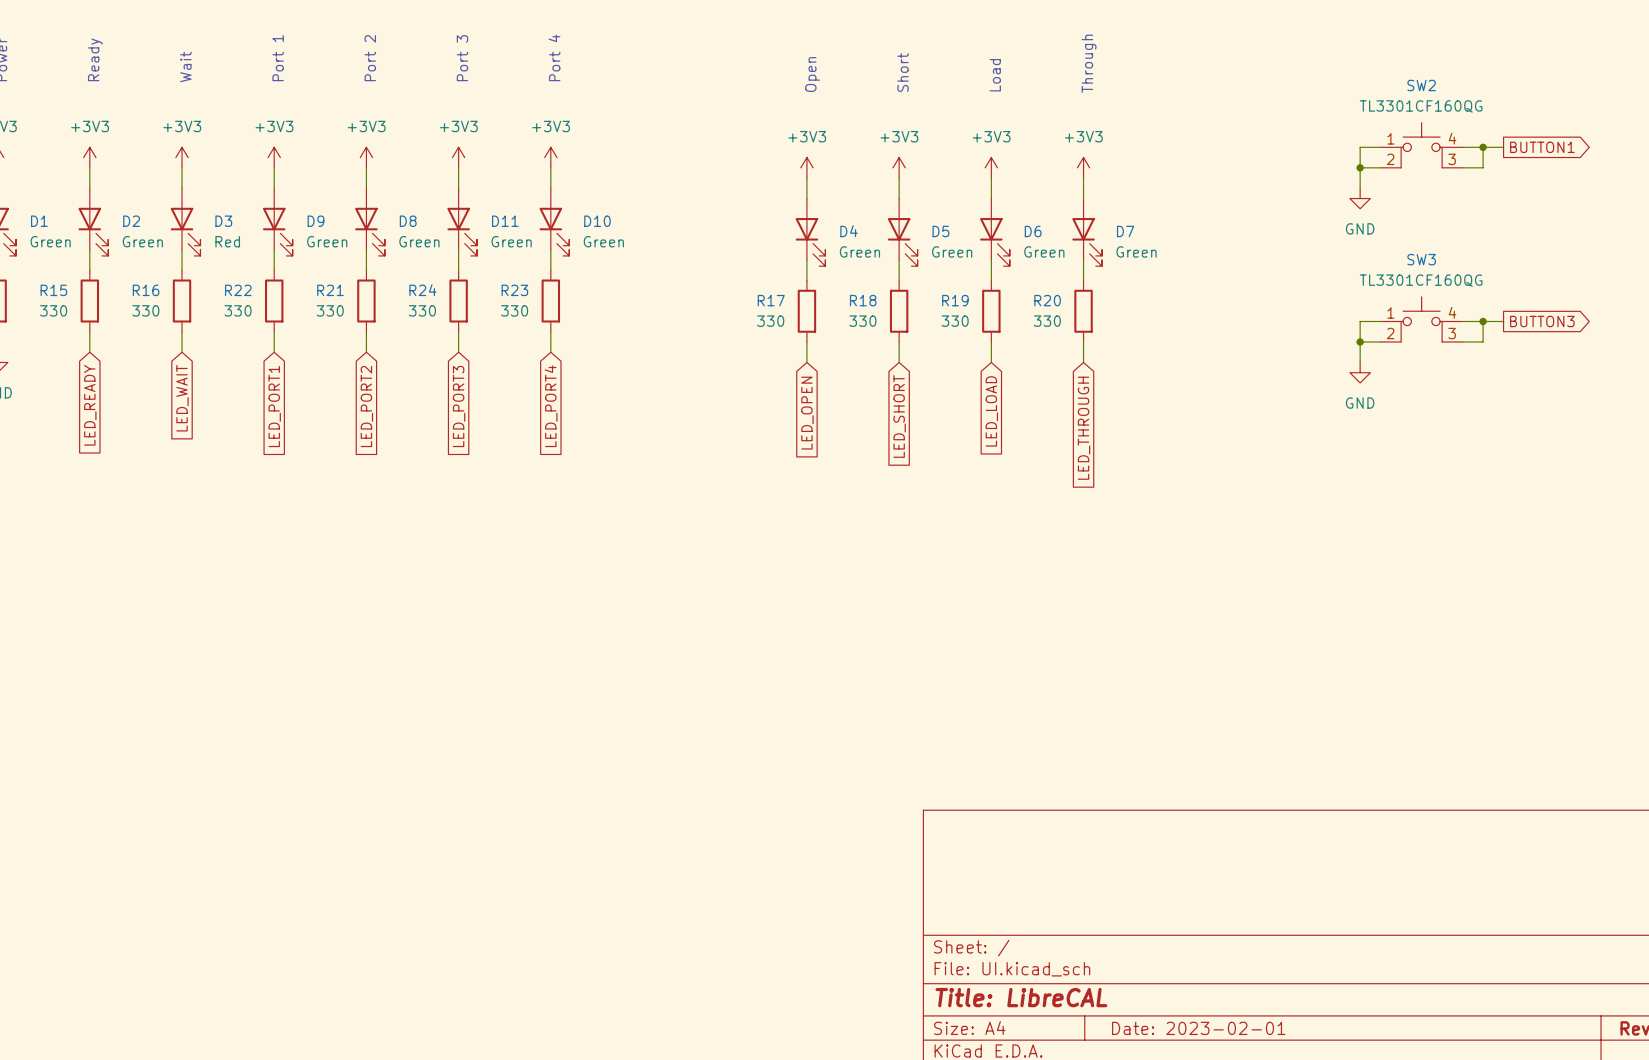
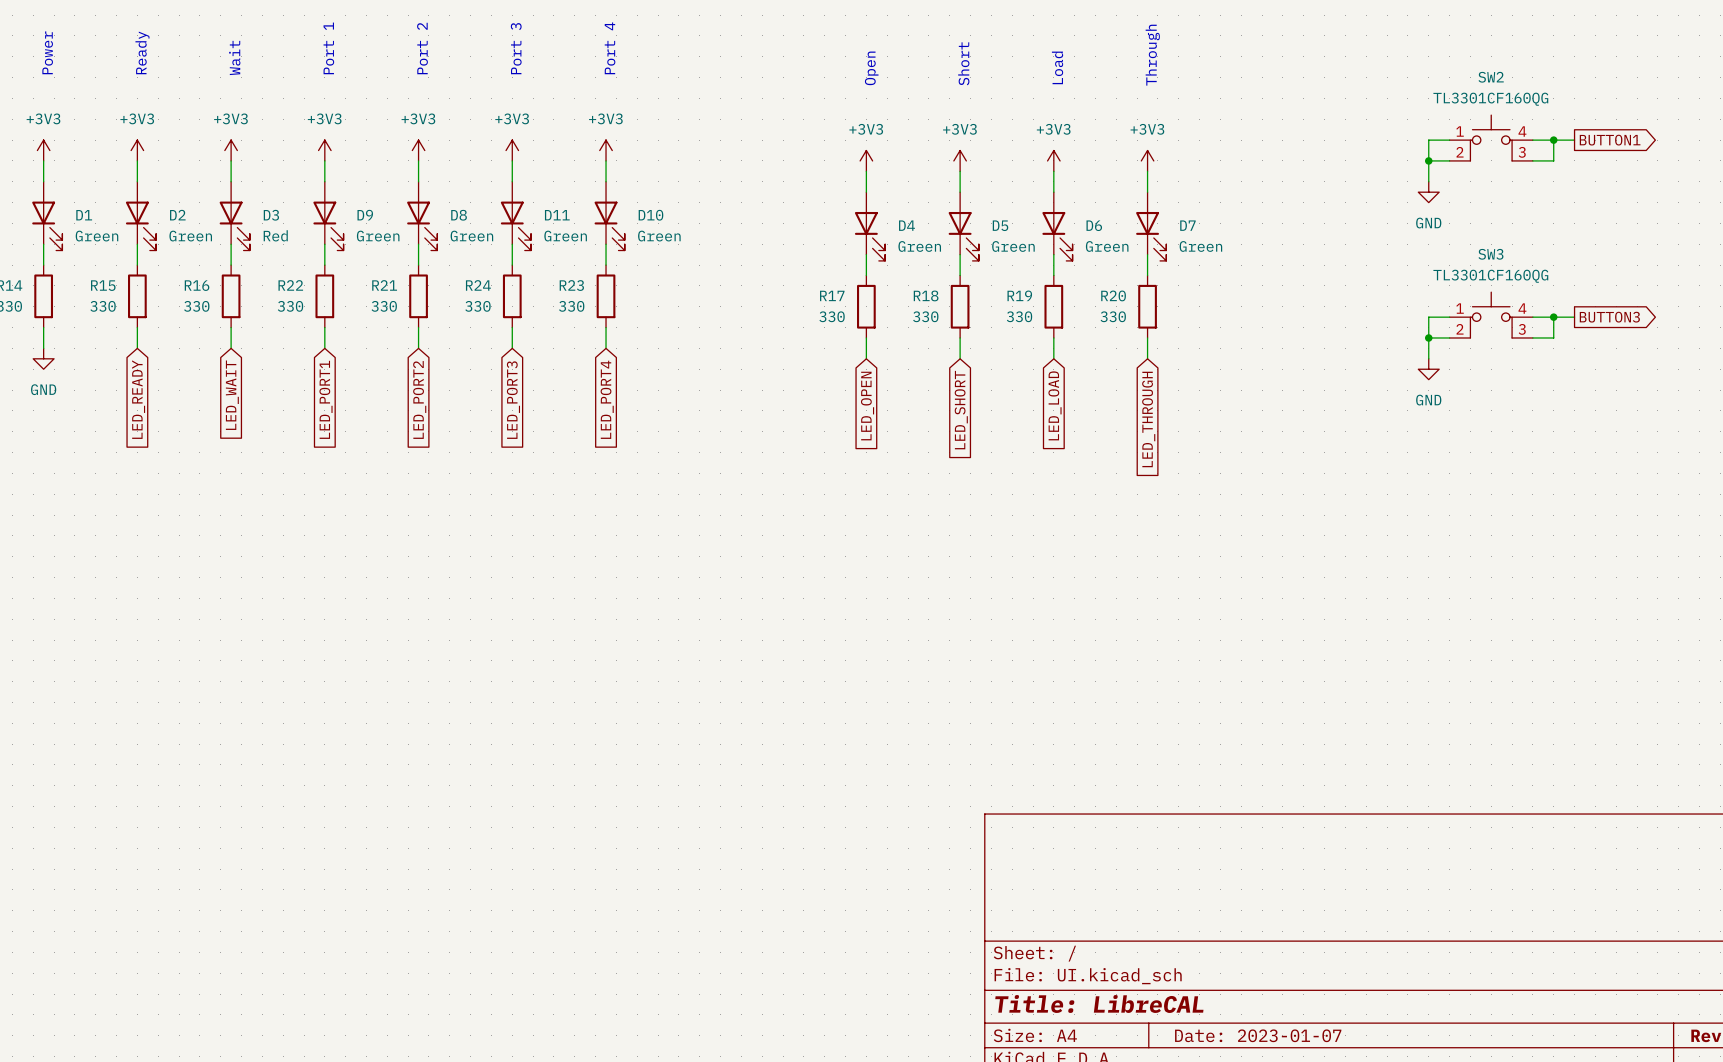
title block: Date: 2023-02-01 (1198, 1028) -> Date: 2023-01-07 (1258, 1035)

